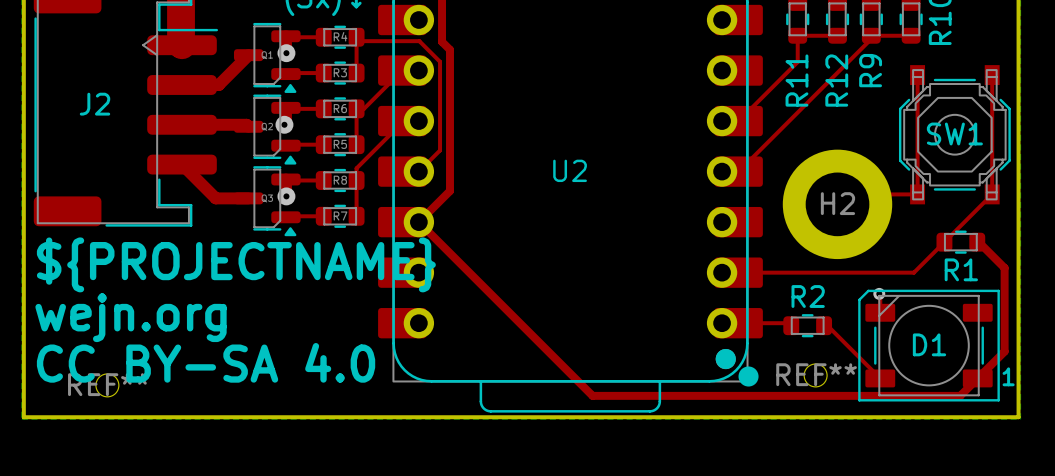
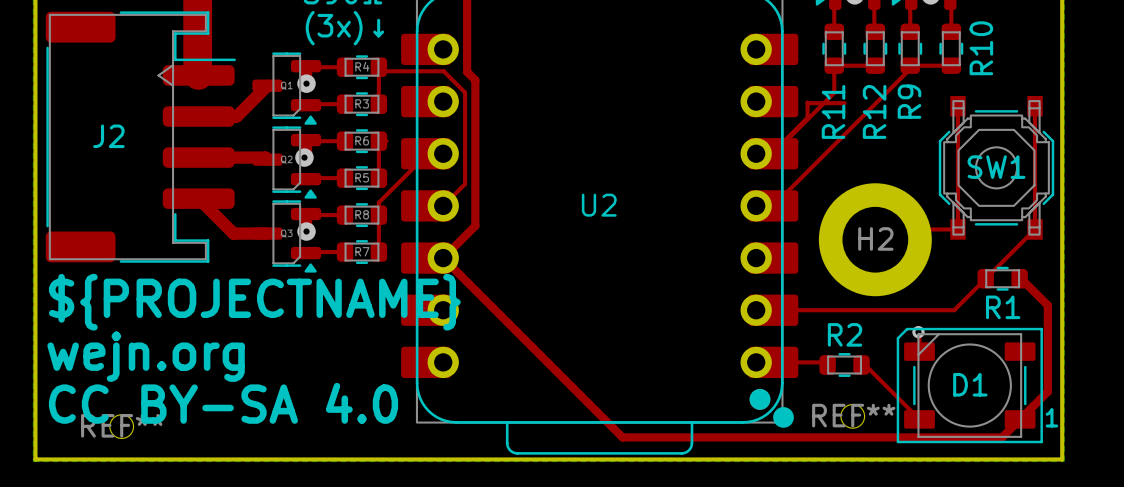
top track: (402, 70) (363, 108) -> none
top track: none -> (844, 103) (807, 102) (807, 117) (764, 160)

